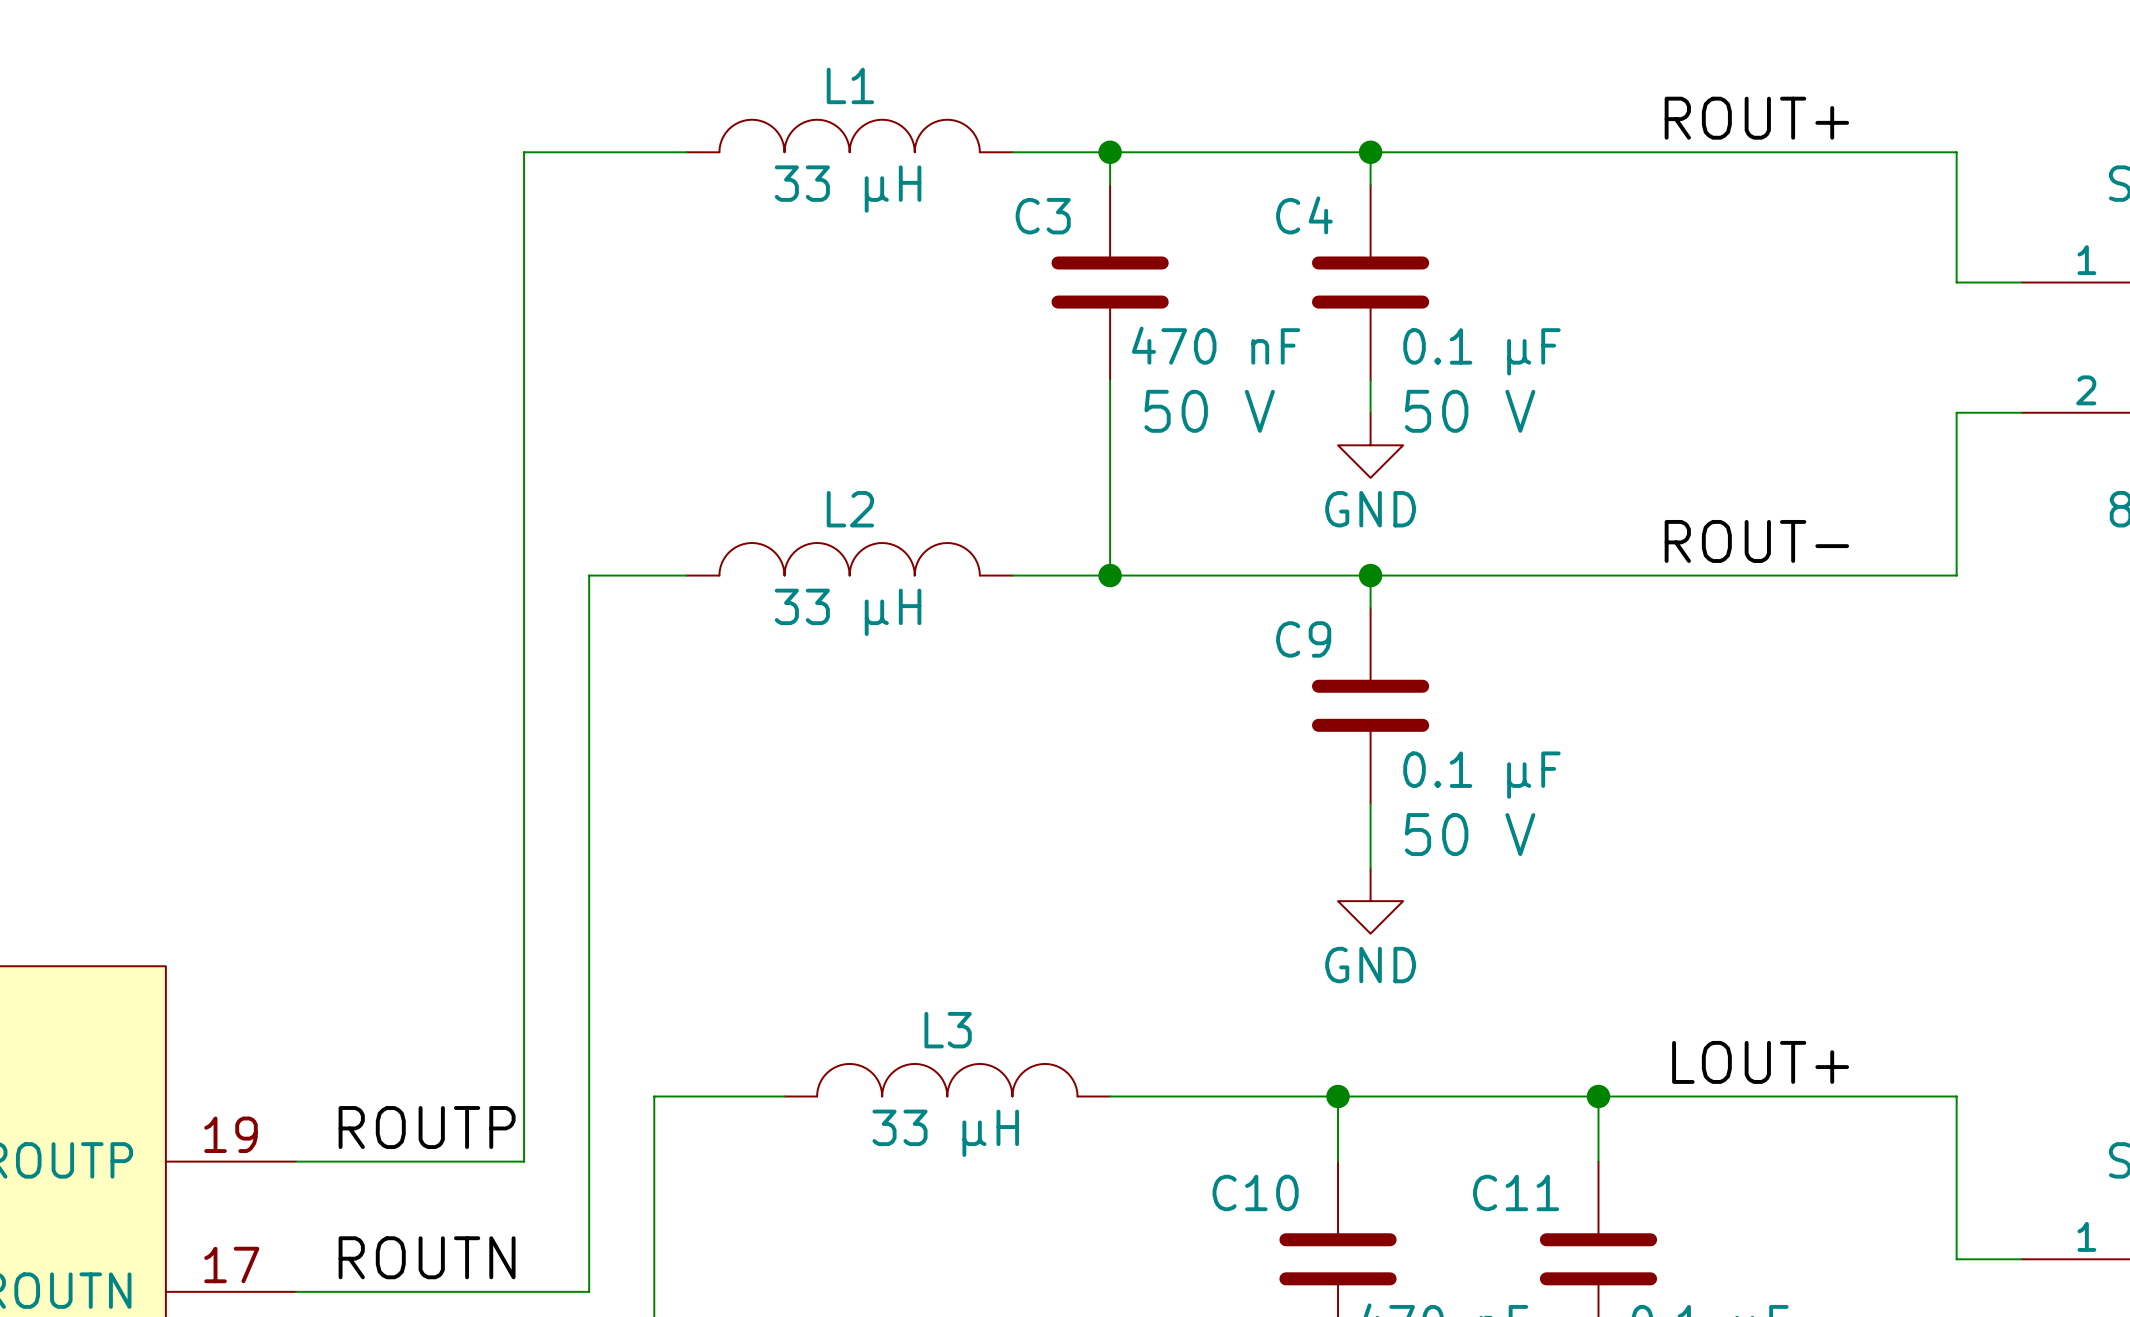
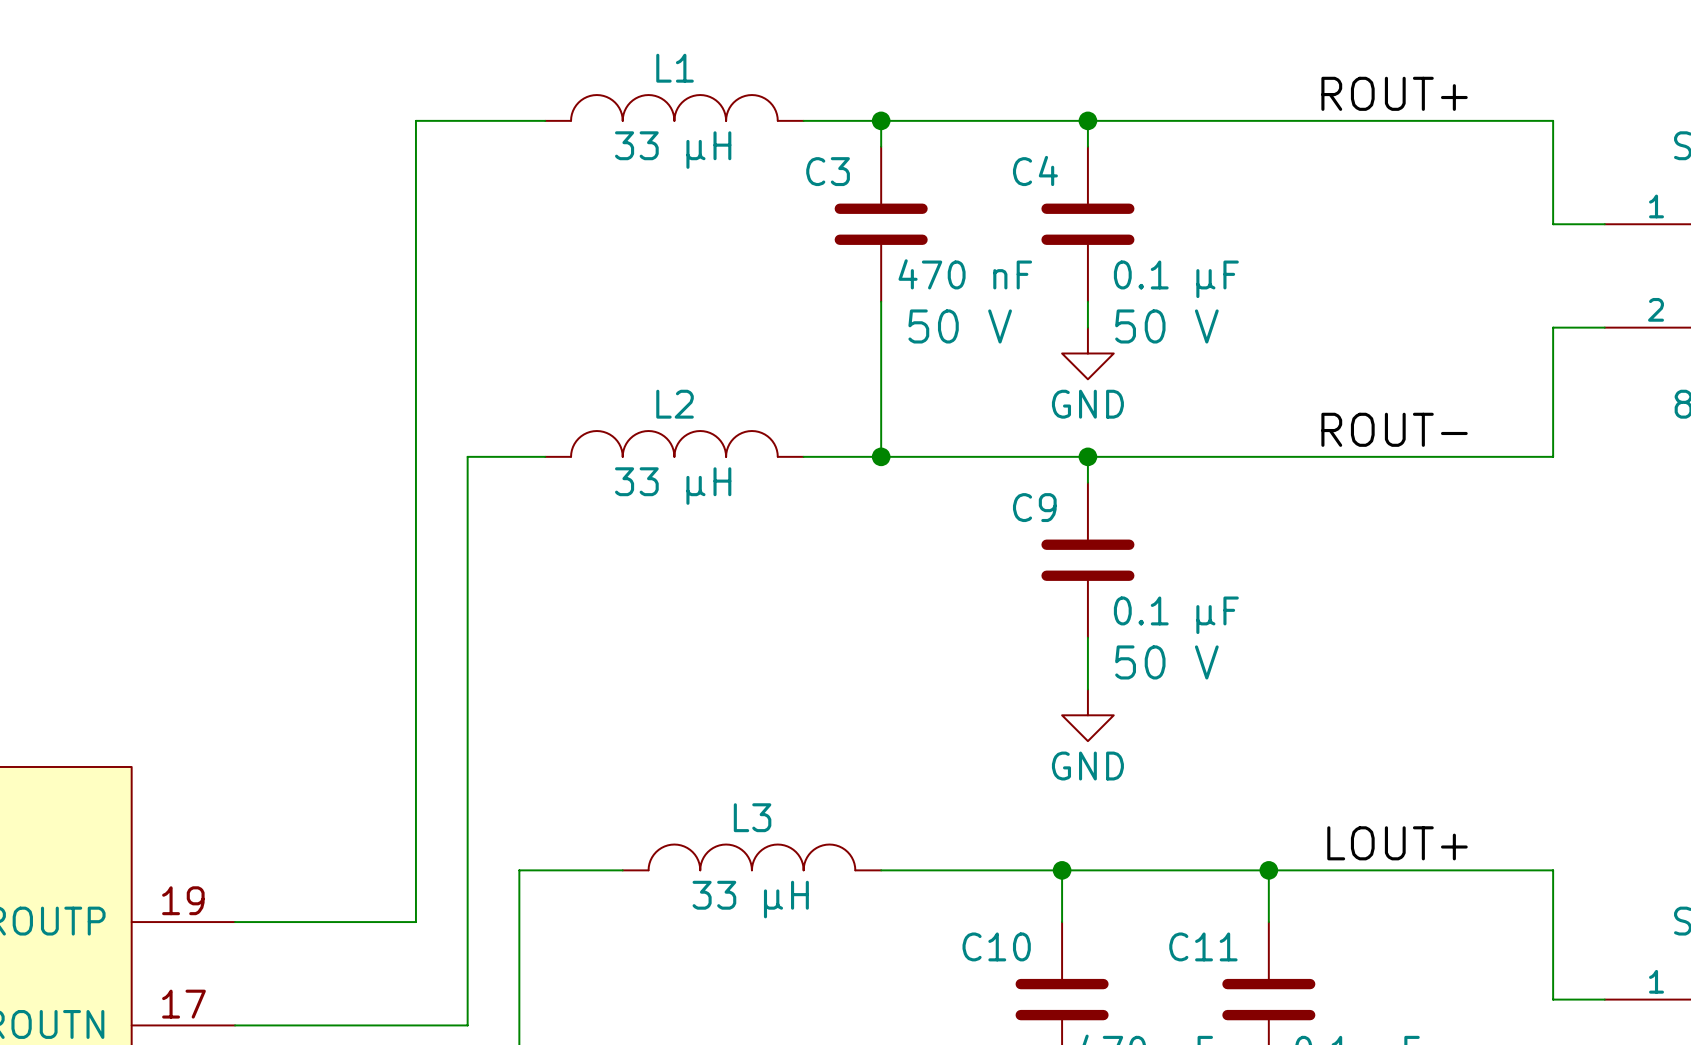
label: ROUTP (427, 1127) -> none
label: ROUTN (427, 1257) -> none

